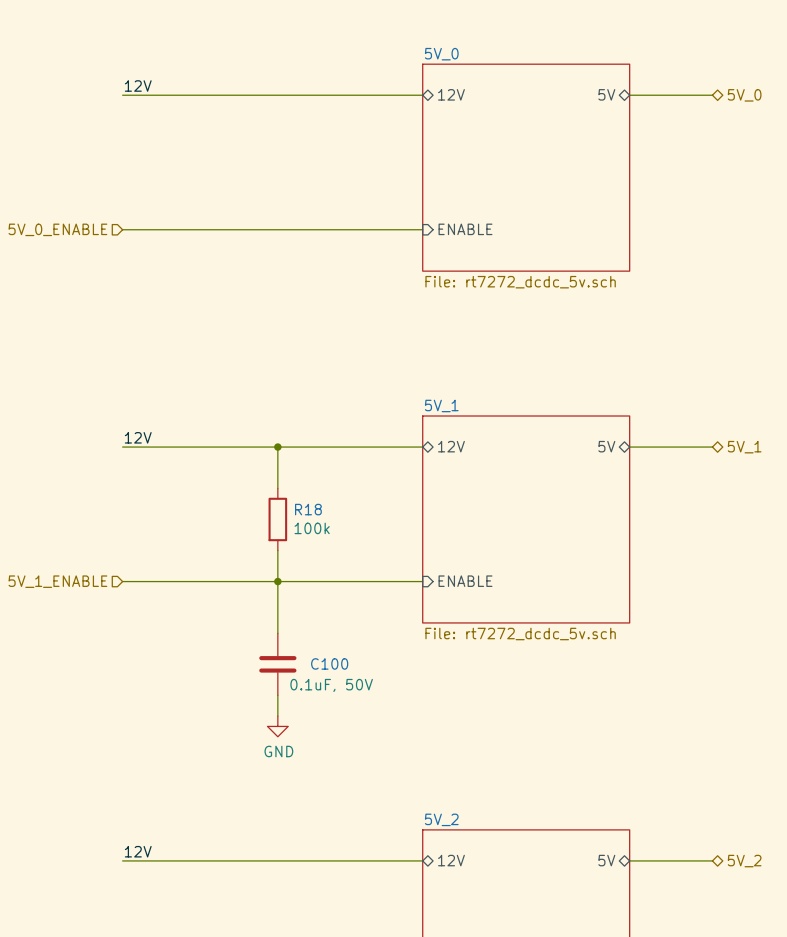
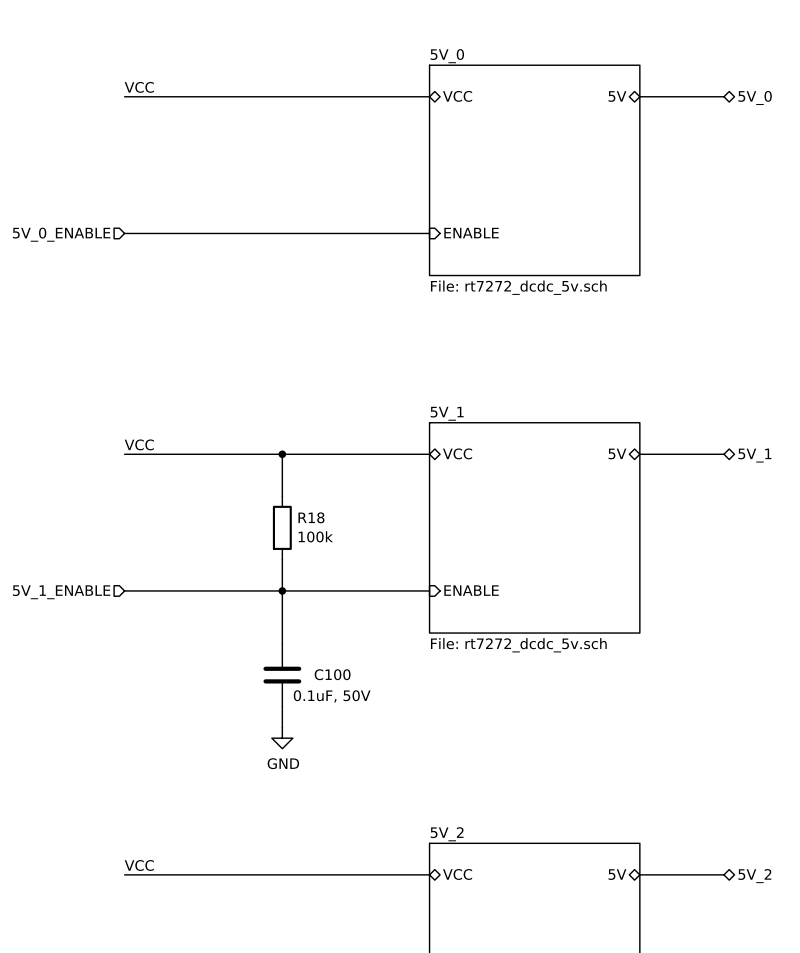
label: 12V (138, 86) -> VCC (139, 87)
sheet pin: 12V (451, 94) -> VCC (457, 96)
label: 12V (138, 437) -> VCC (139, 444)
sheet pin: 12V (451, 446) -> VCC (457, 453)
label: 12V (138, 851) -> VCC (139, 865)
sheet pin: 12V (451, 860) -> VCC (457, 874)

